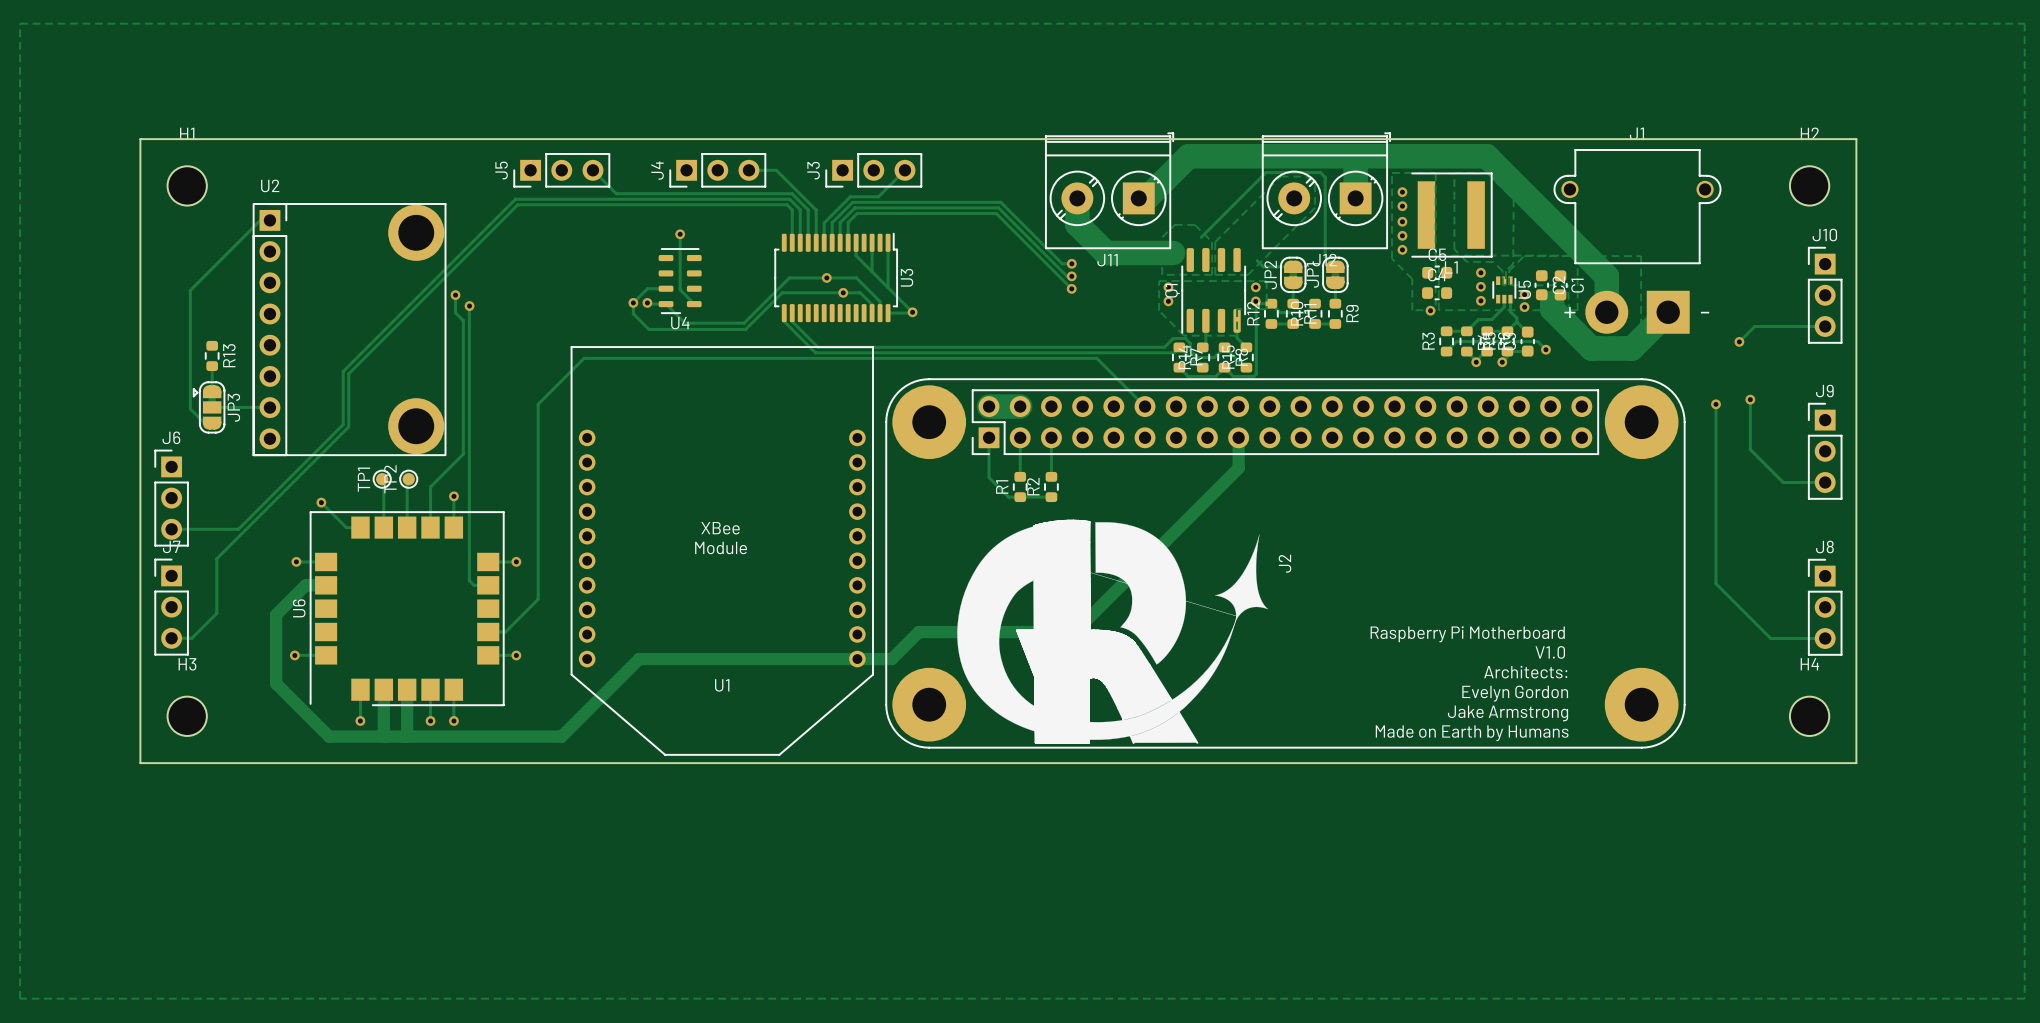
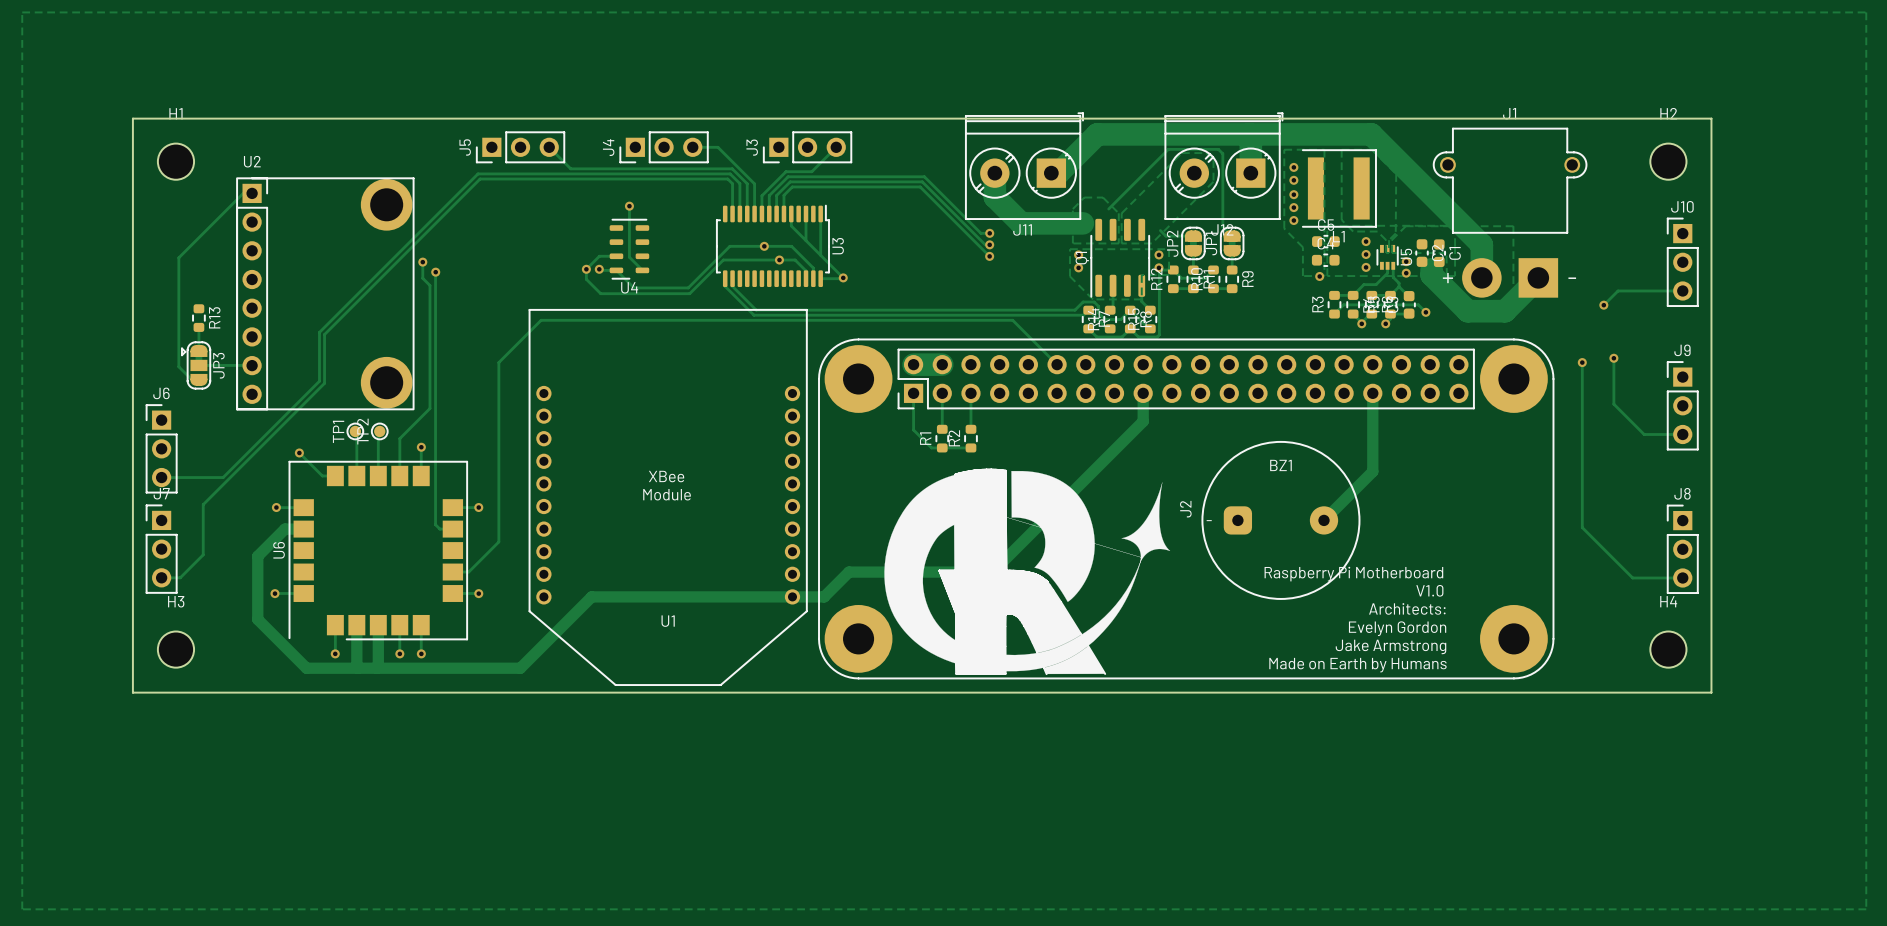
track: none -> (1372, 393) (1372, 471) (1324, 520)
BZ1: none -> (1280, 520)

